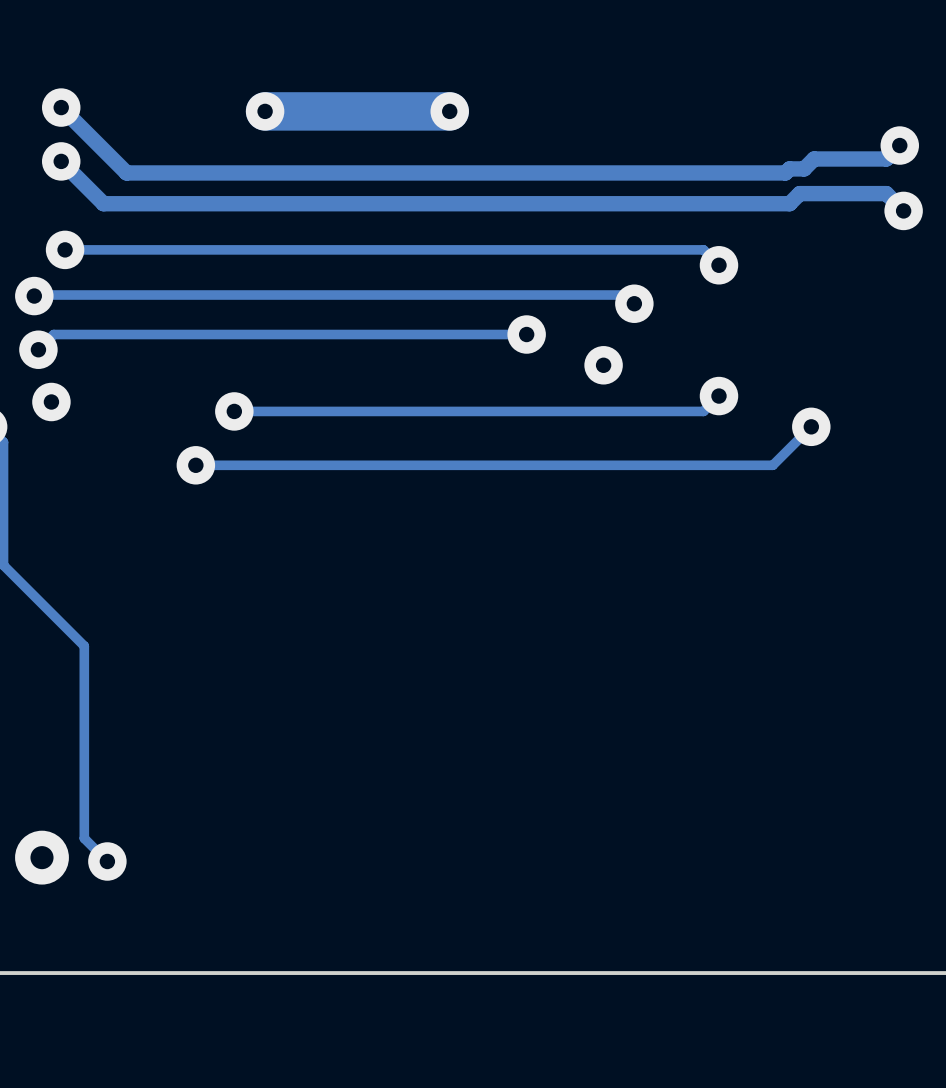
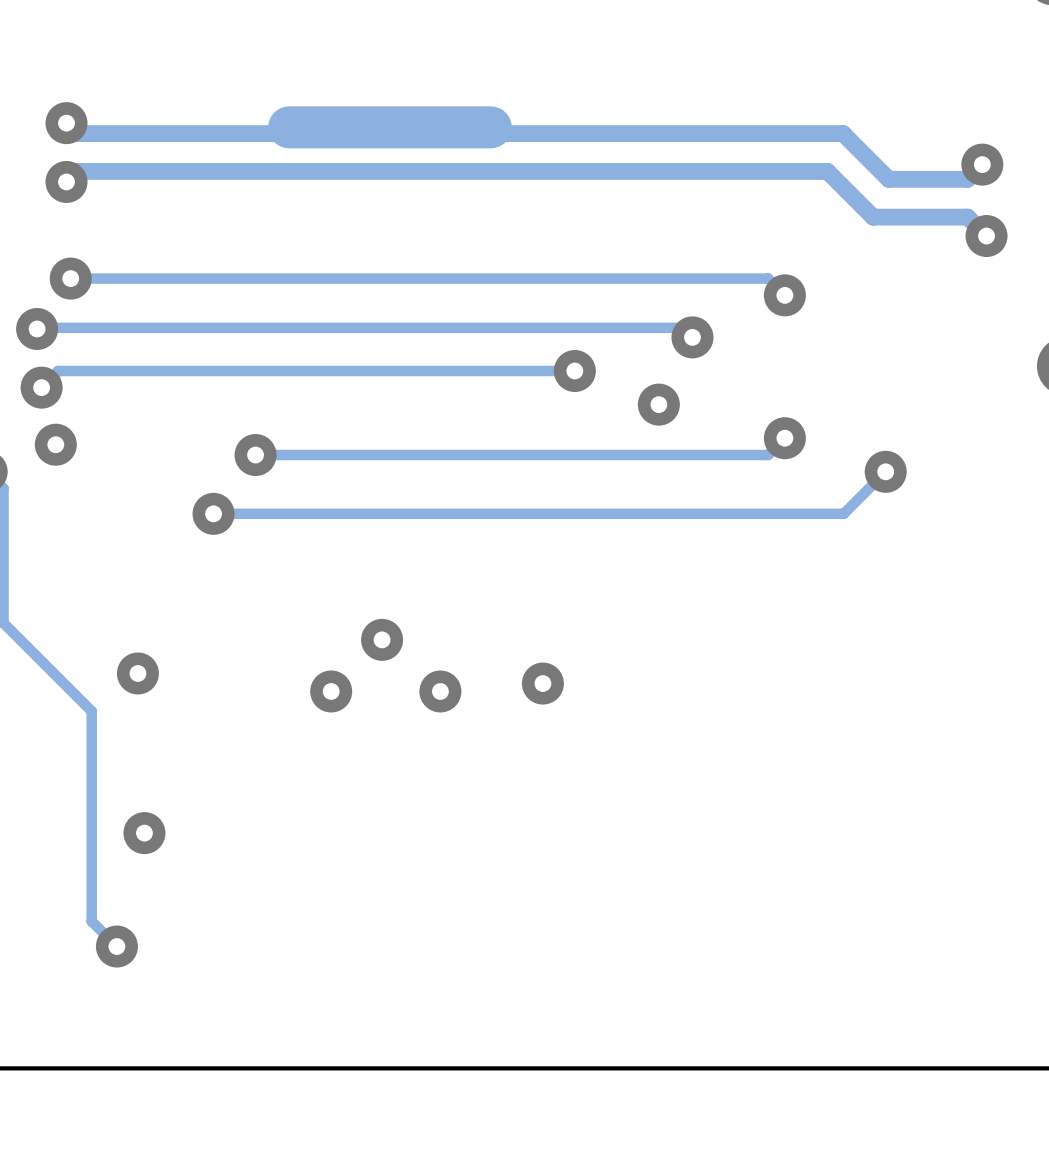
via: (265, 111) -> none
via: (449, 111) -> none
track: (70, 117) (126, 172) (785, 172) (789, 168) (804, 168) (814, 158) -> (77, 133) (843, 133) (888, 179)
track: (61, 161) (103, 203) (789, 203) (799, 193) -> (66, 181) (77, 171) (827, 171) (873, 217)
via: none -> (382, 639)
via: none -> (137, 673)
via: none -> (542, 683)
via: none -> (331, 691)
via: none -> (440, 691)
via: none -> (144, 833)
via: (41, 857) -> none

